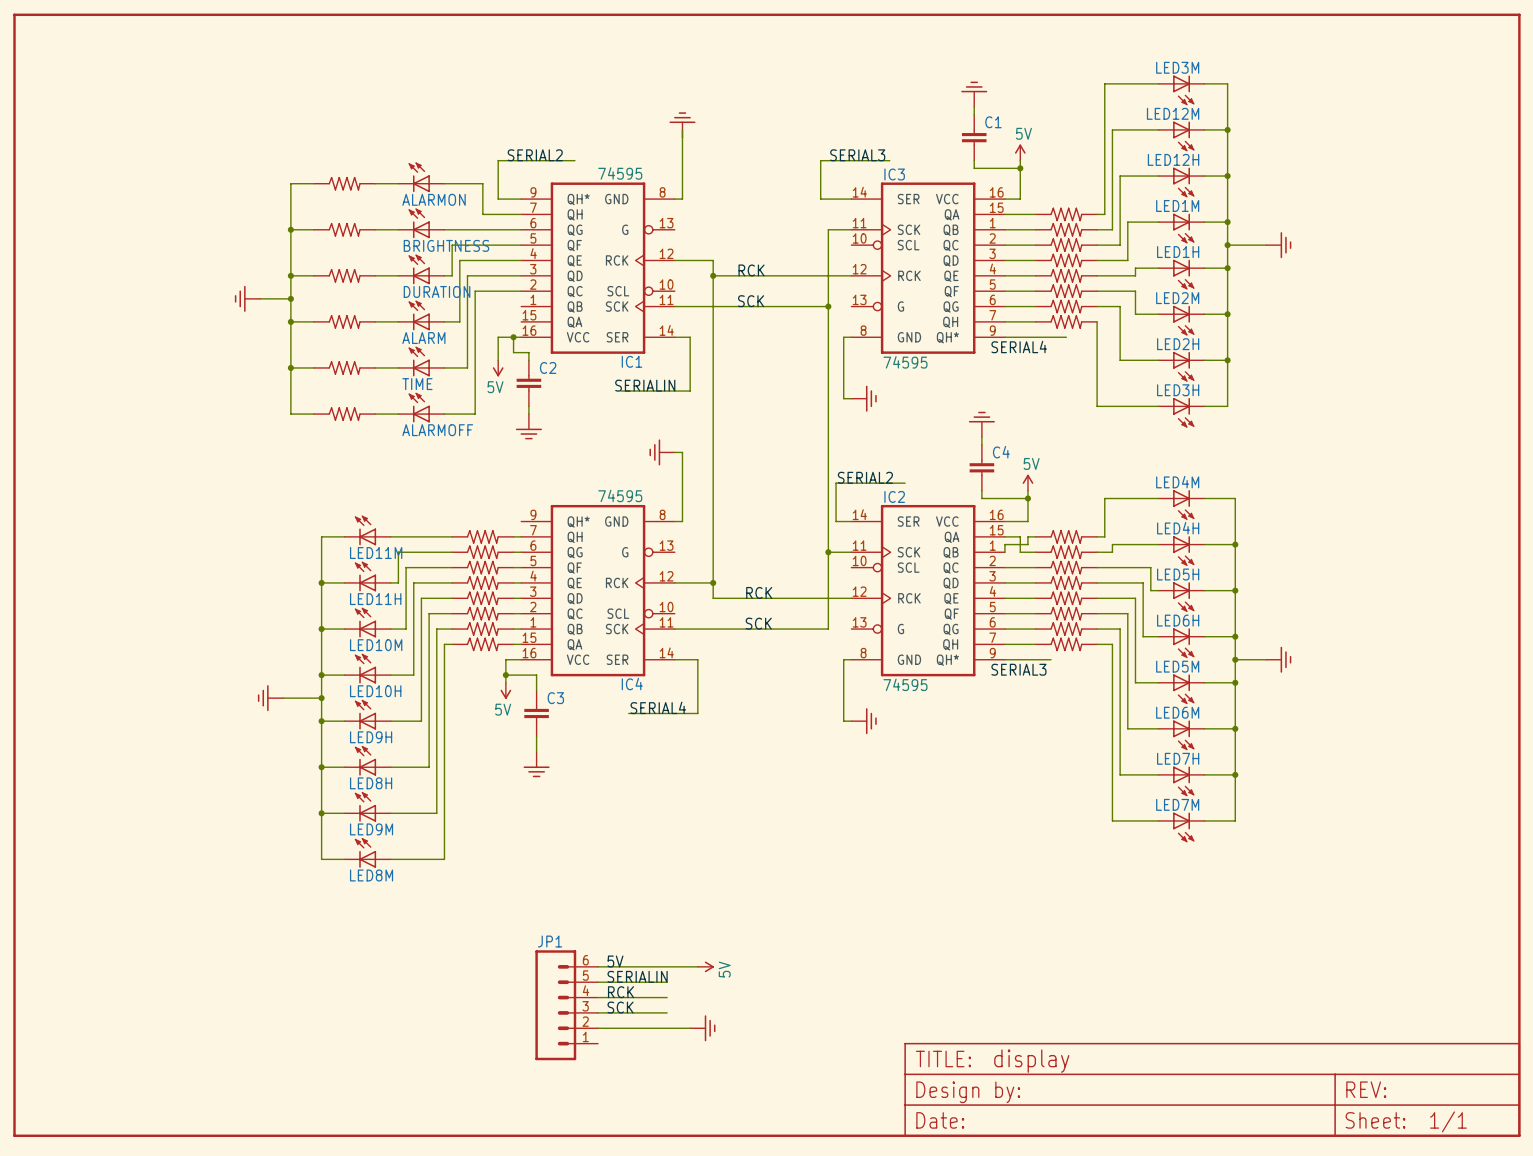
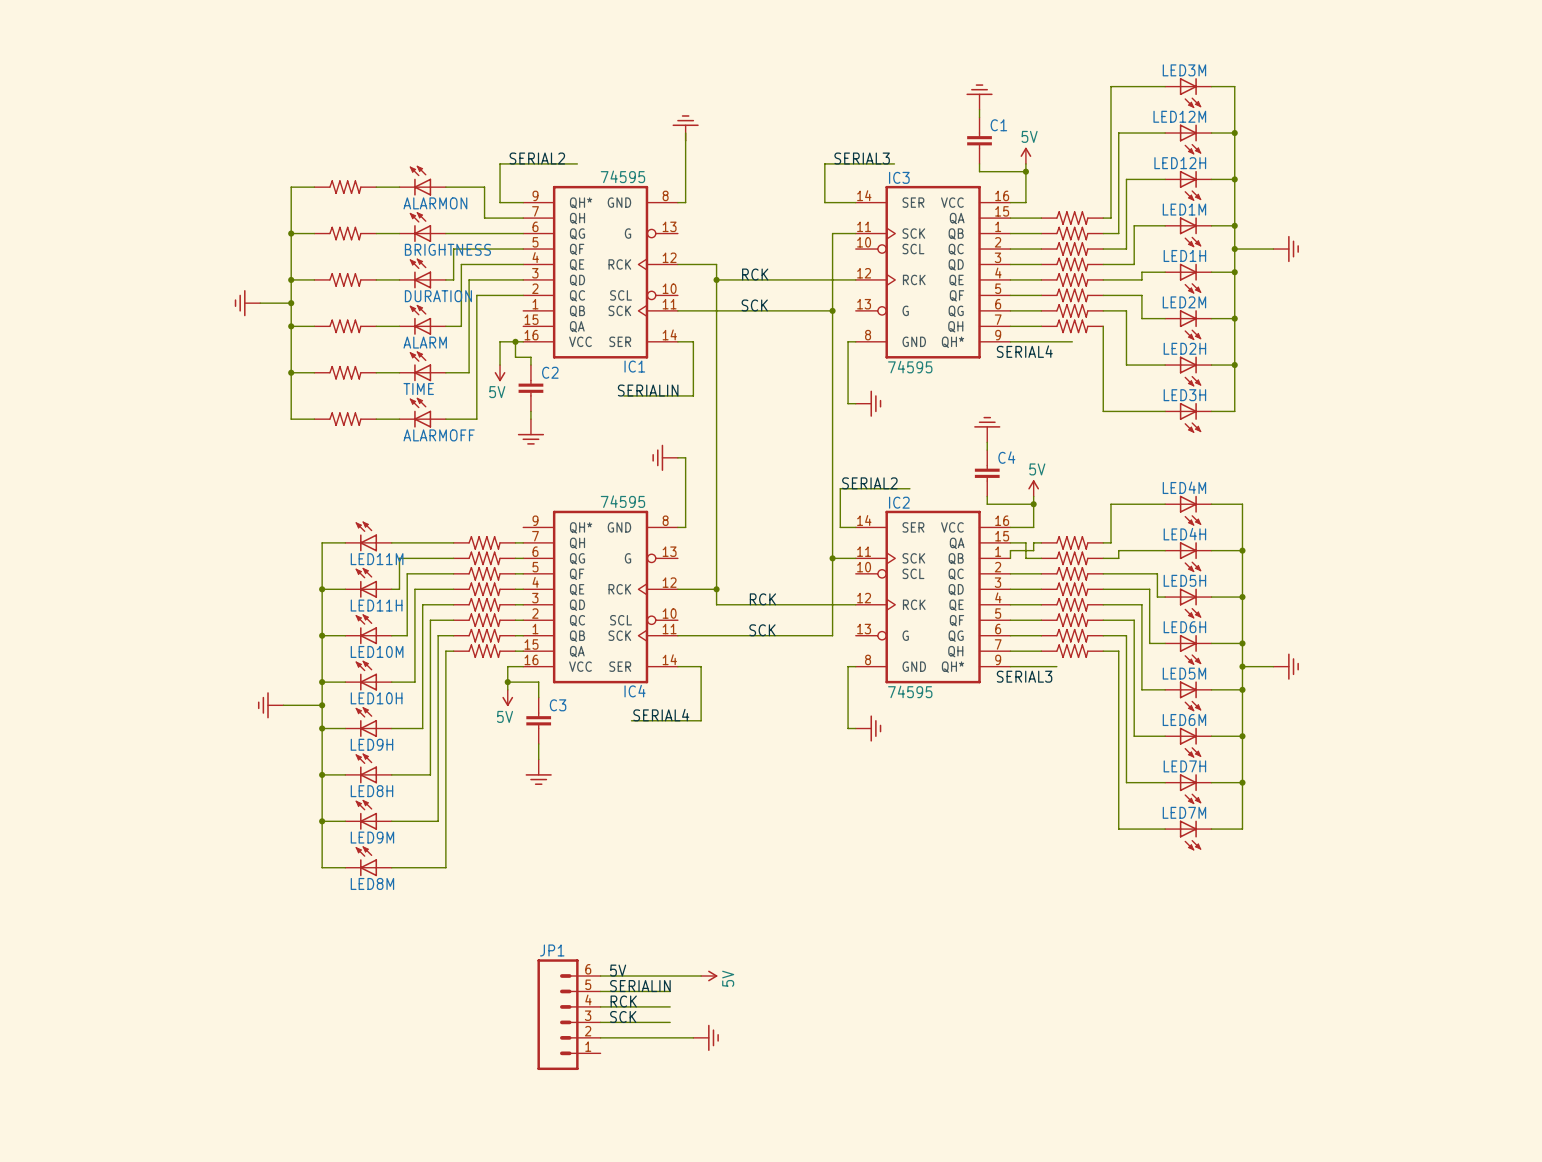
part: (766, 575) -> none
part: (1212, 1089) -> none

